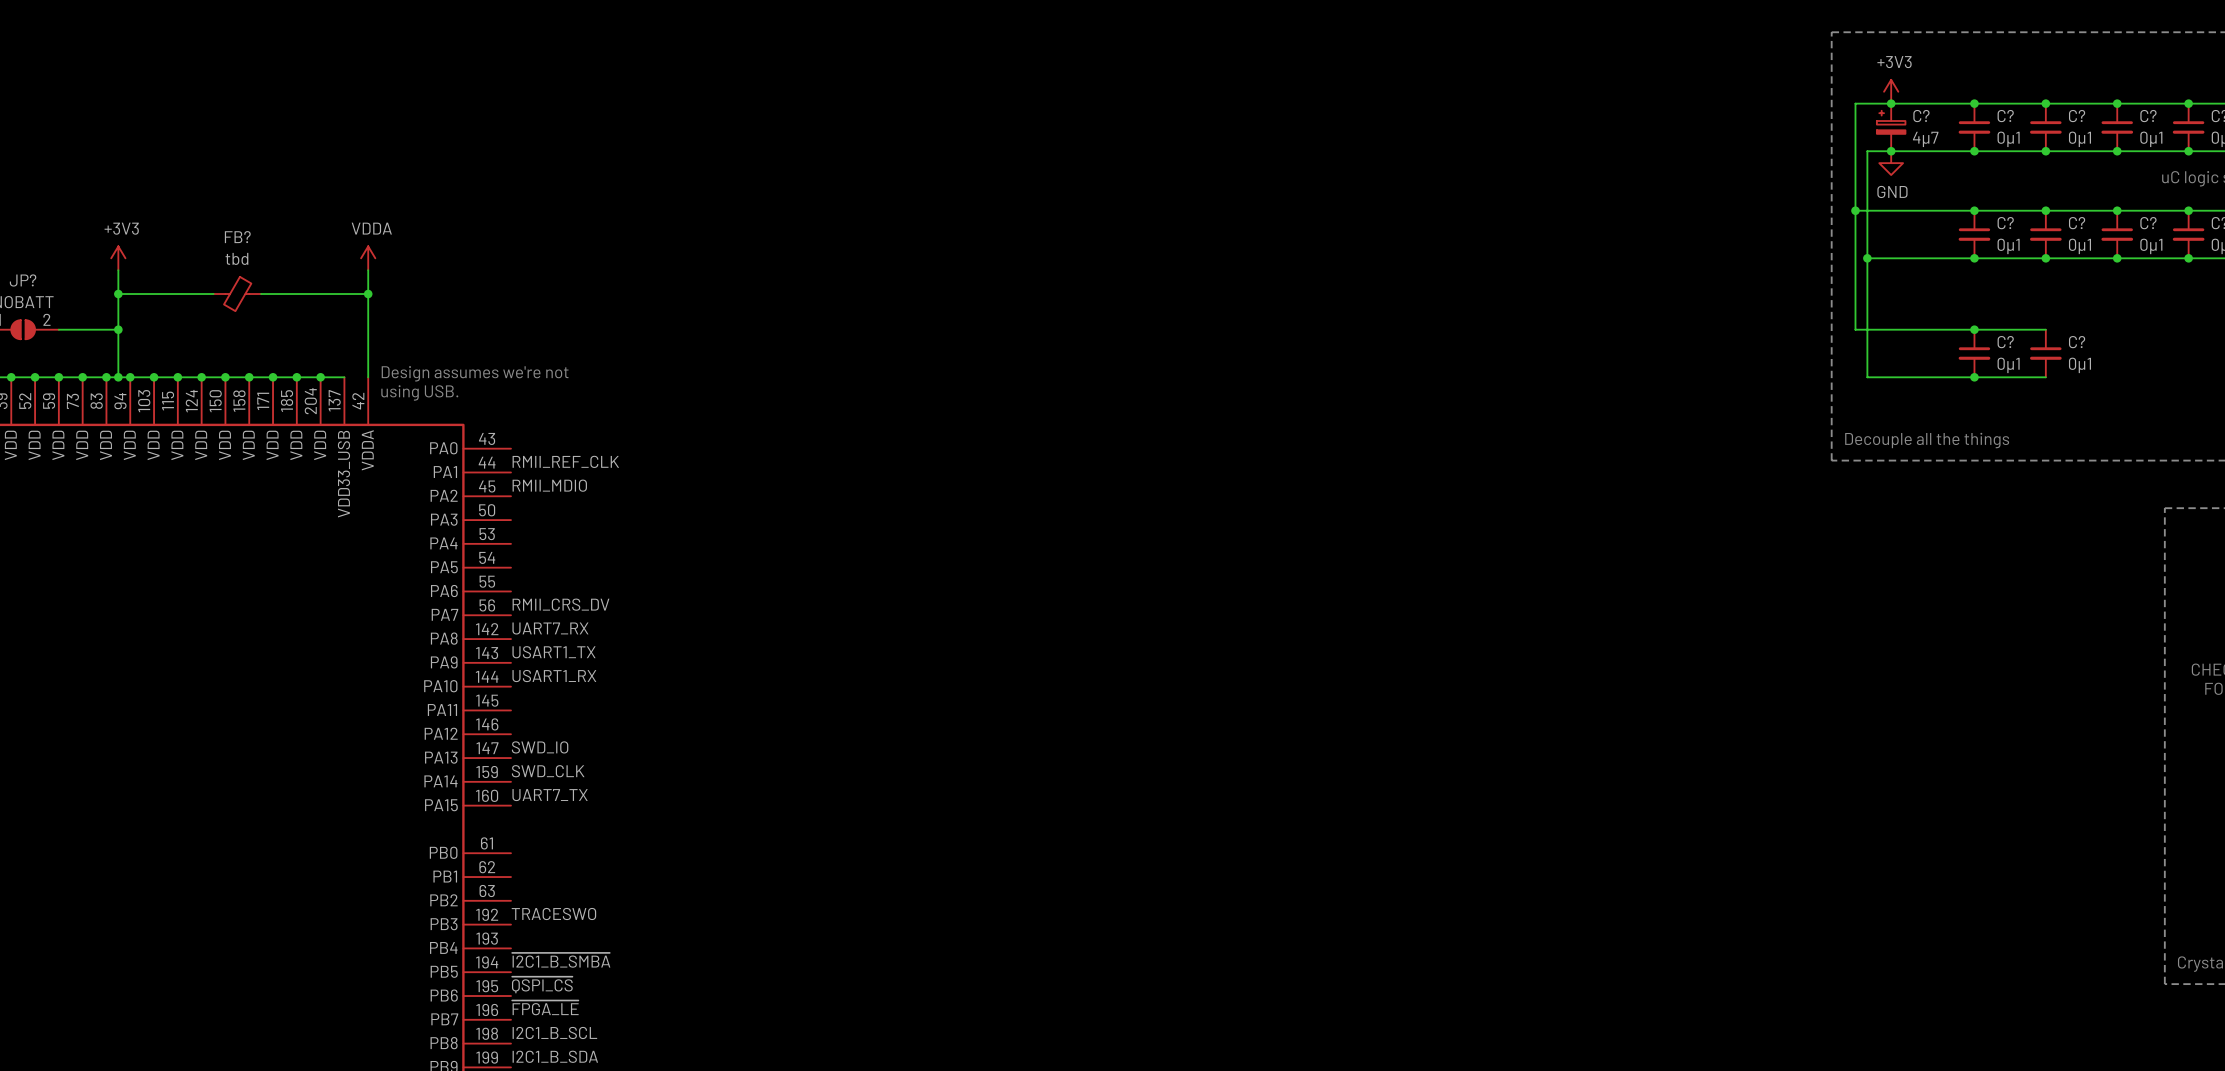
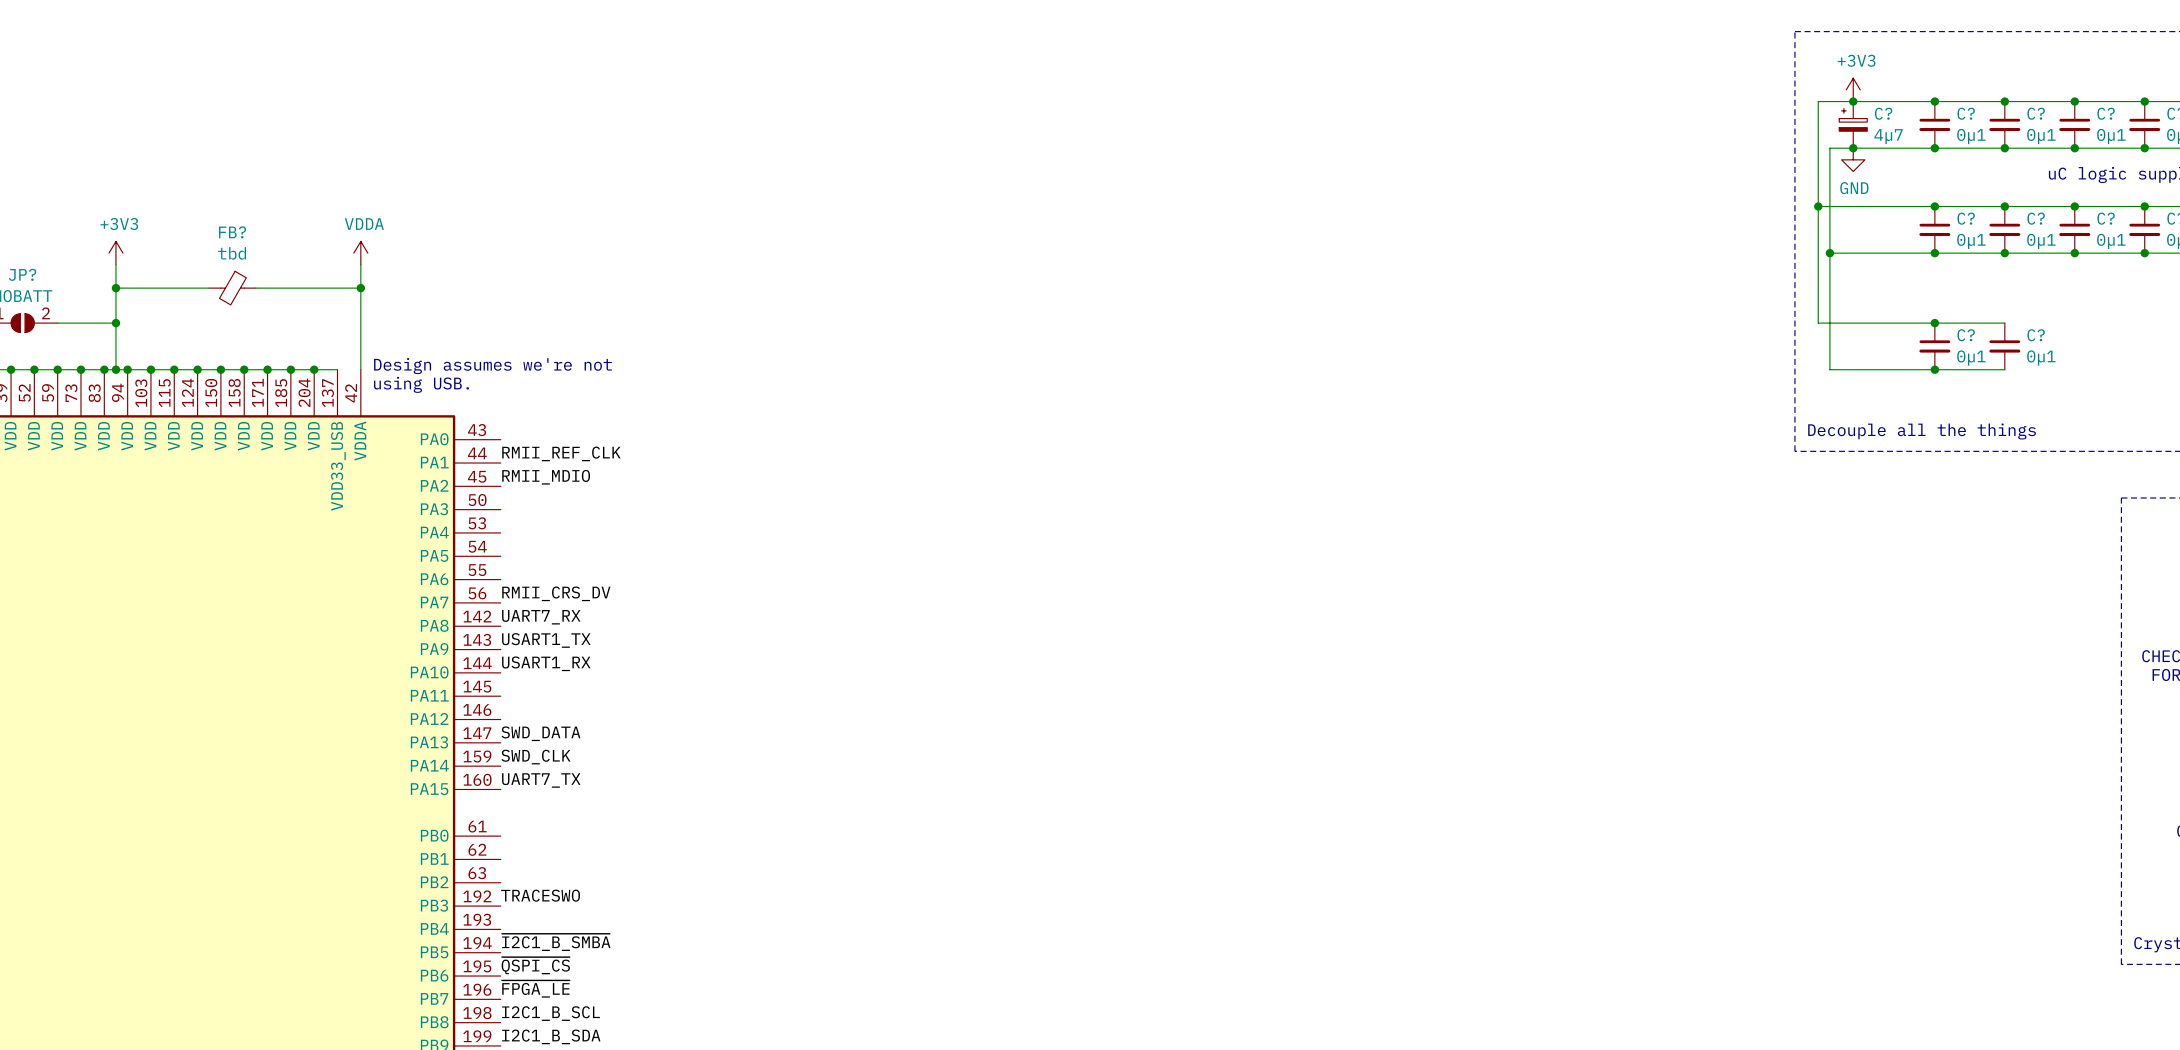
label: SWD_IO (540, 747) -> SWD_DATA (540, 733)

